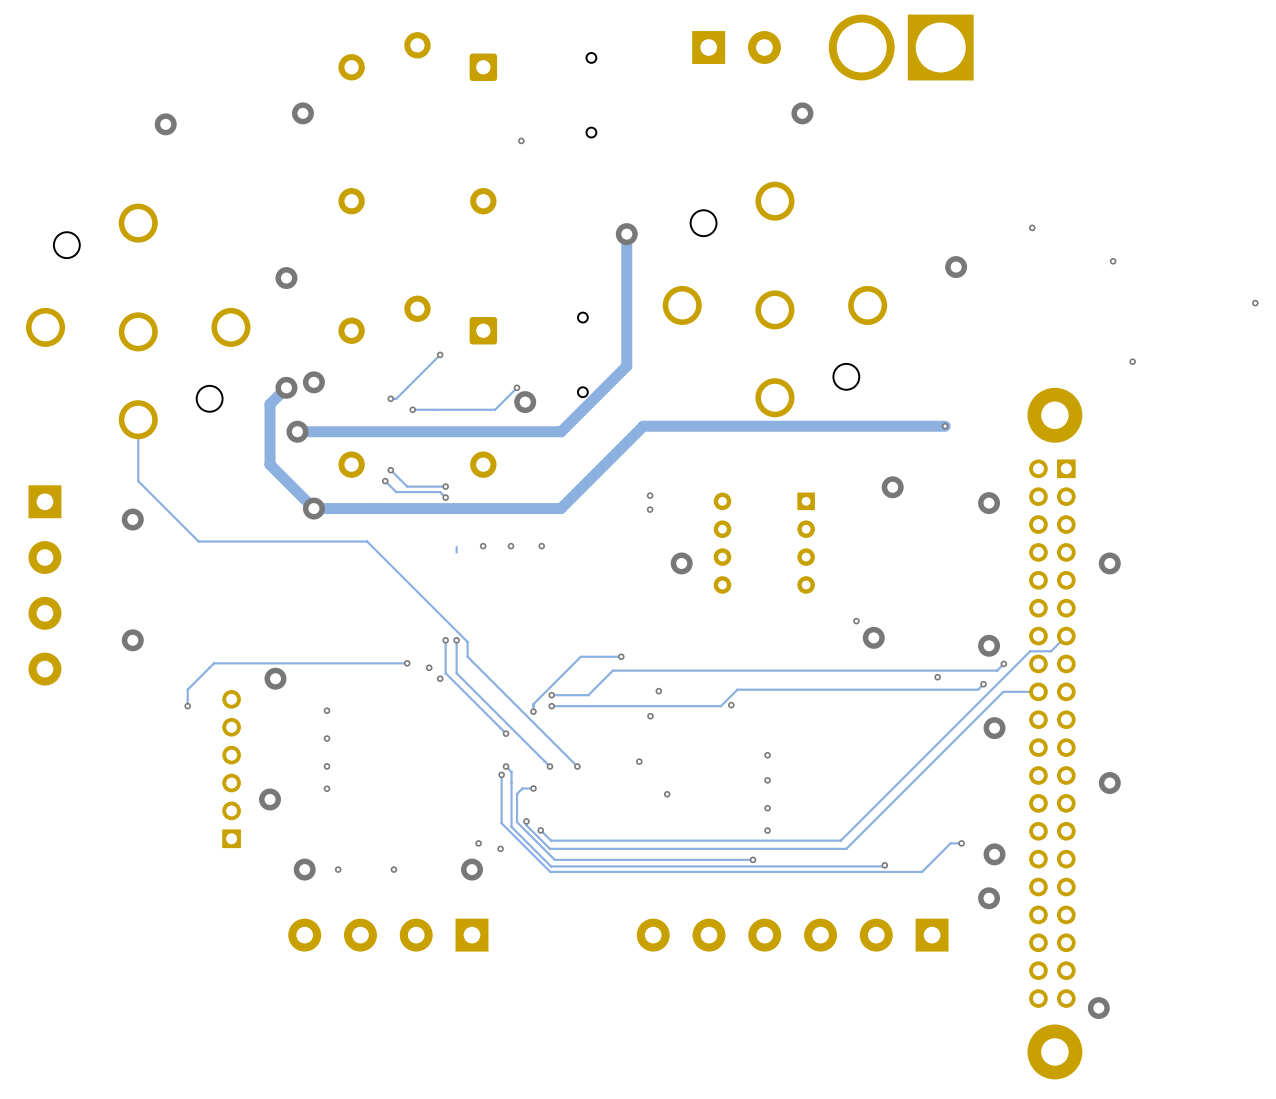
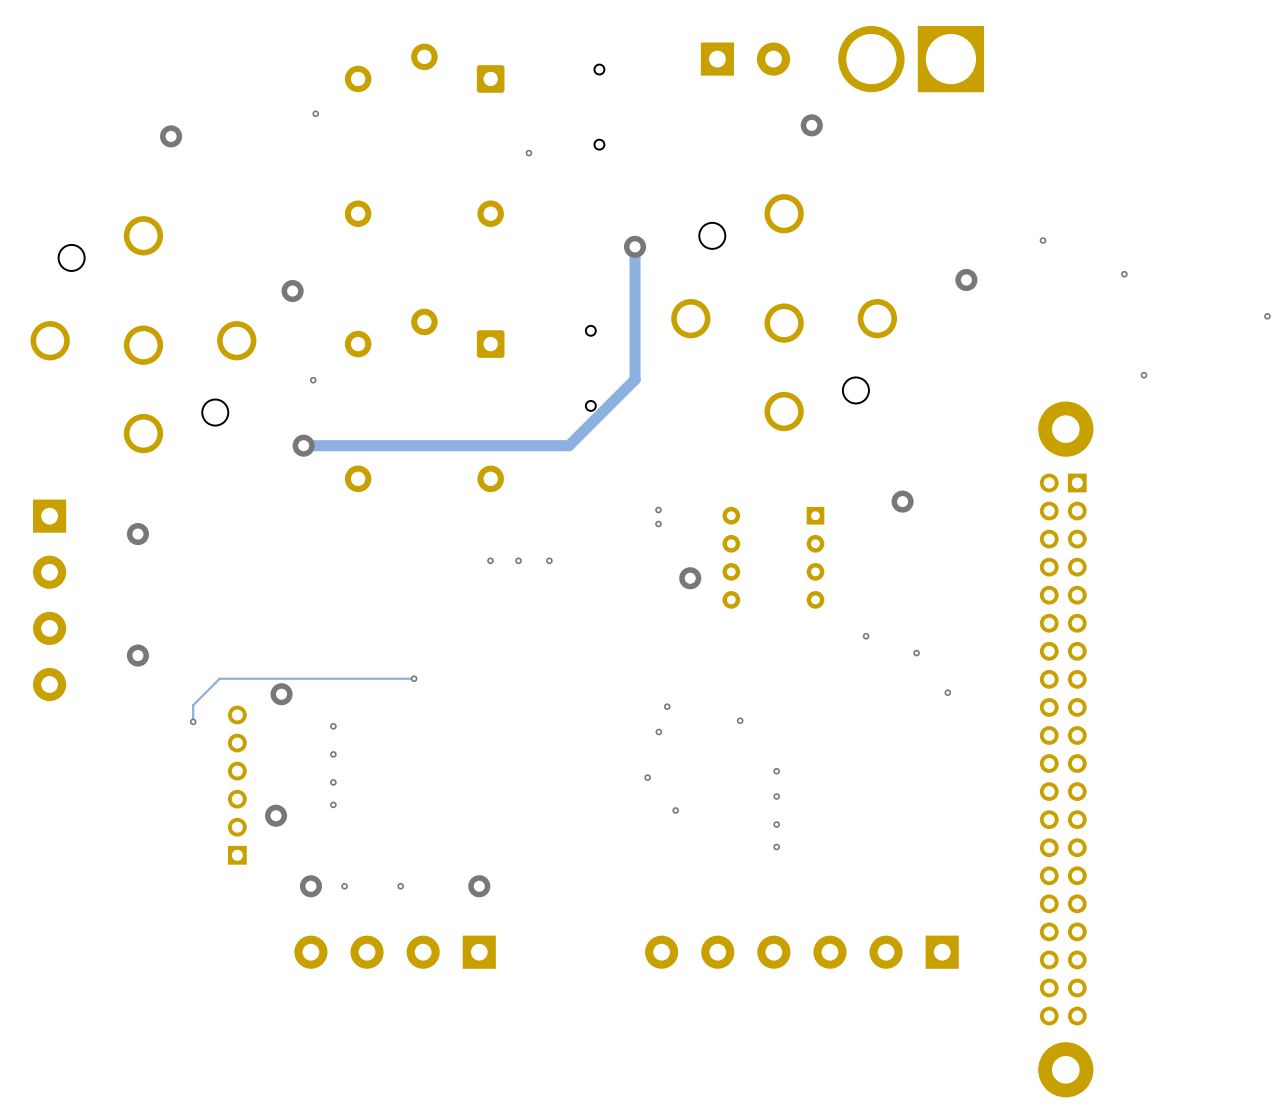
via: none -> (315, 113)
via: (302, 113) -> none
track: (440, 354) (396, 398) (390, 398) -> none
via: (440, 354) -> none
via: none -> (313, 380)
via: (313, 382) -> none
track: (286, 387) (270, 404) (270, 464) (313, 508) (560, 508) (643, 426) (945, 426) -> none
via: (286, 387) -> none
track: (517, 387) (495, 409) (412, 409) -> none
via: (517, 387) -> none
via: (390, 398) -> none
via: (525, 402) -> none
via: (412, 409) -> none
track: (138, 419) (138, 481) (198, 541) (367, 541) (467, 641) (467, 656) (577, 766) -> none
via: (945, 426) -> none
track: (390, 470) (407, 486) (445, 486) -> none
via: (390, 470) -> none
track: (385, 481) (396, 492) (440, 492) (445, 497) -> none
via: (385, 481) -> none
via: (445, 486) -> none
via: (445, 497) -> none
via: (989, 503) -> none
via: (313, 508) -> none
track: (456, 546) (456, 552) -> none
via: (1109, 563) -> none
track: (1066, 636) (1051, 651) (1030, 651) (840, 840) (551, 840) (540, 830) -> none
via: (873, 637) -> none
via: none -> (916, 653)
track: (445, 640) (445, 673) (506, 733) -> none
via: (445, 640) -> none
track: (456, 640) (456, 673) (549, 766) -> none
via: (456, 640) -> none
via: (989, 645) -> none
track: (621, 656) (580, 656) (533, 704) (533, 711) -> none
via: (621, 656) -> none
track: (1003, 663) (997, 670) (612, 670) (588, 695) (551, 695) -> none
via: (1003, 663) -> none
via: (429, 667) -> none
via: (440, 678) -> none
track: (983, 684) (978, 689) (737, 689) (720, 706) (551, 706) -> none
via: (983, 684) -> none
track: (1038, 691) (1003, 691) (846, 848) (549, 848) (526, 825) (526, 821) -> none
via: (551, 695) -> none
via: (551, 706) -> none
via: (533, 711) -> none
via: (994, 728) -> none
via: (506, 733) -> none
track: (506, 766) (511, 772) (511, 826) (551, 866) (884, 865) -> none
via: (506, 766) -> none
via: (549, 766) -> none
via: (577, 766) -> none
track: (501, 774) (501, 823) (550, 871) (922, 871) (950, 843) (961, 843) -> none
via: (501, 774) -> none
via: (1109, 783) -> none
track: (533, 788) (522, 788) (517, 793) (517, 822) (554, 859) (753, 859) -> none
via: (533, 788) -> none
via: (526, 821) -> none
via: (540, 830) -> none
via: (478, 843) -> none
via: (961, 843) -> none
via: (500, 848) -> none
via: (994, 854) -> none
via: (753, 859) -> none
via: (884, 865) -> none
via: (989, 898) -> none
via: (1098, 1008) -> none

